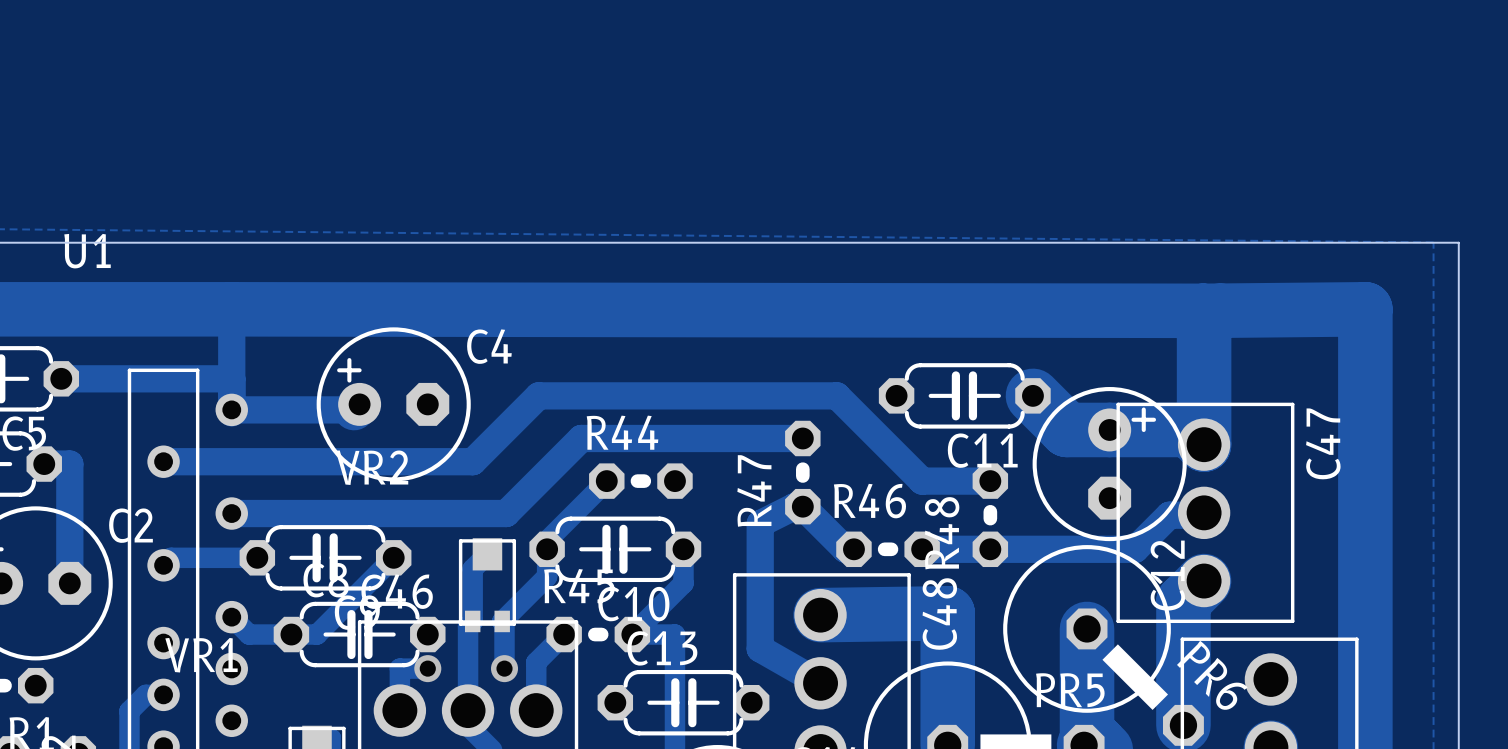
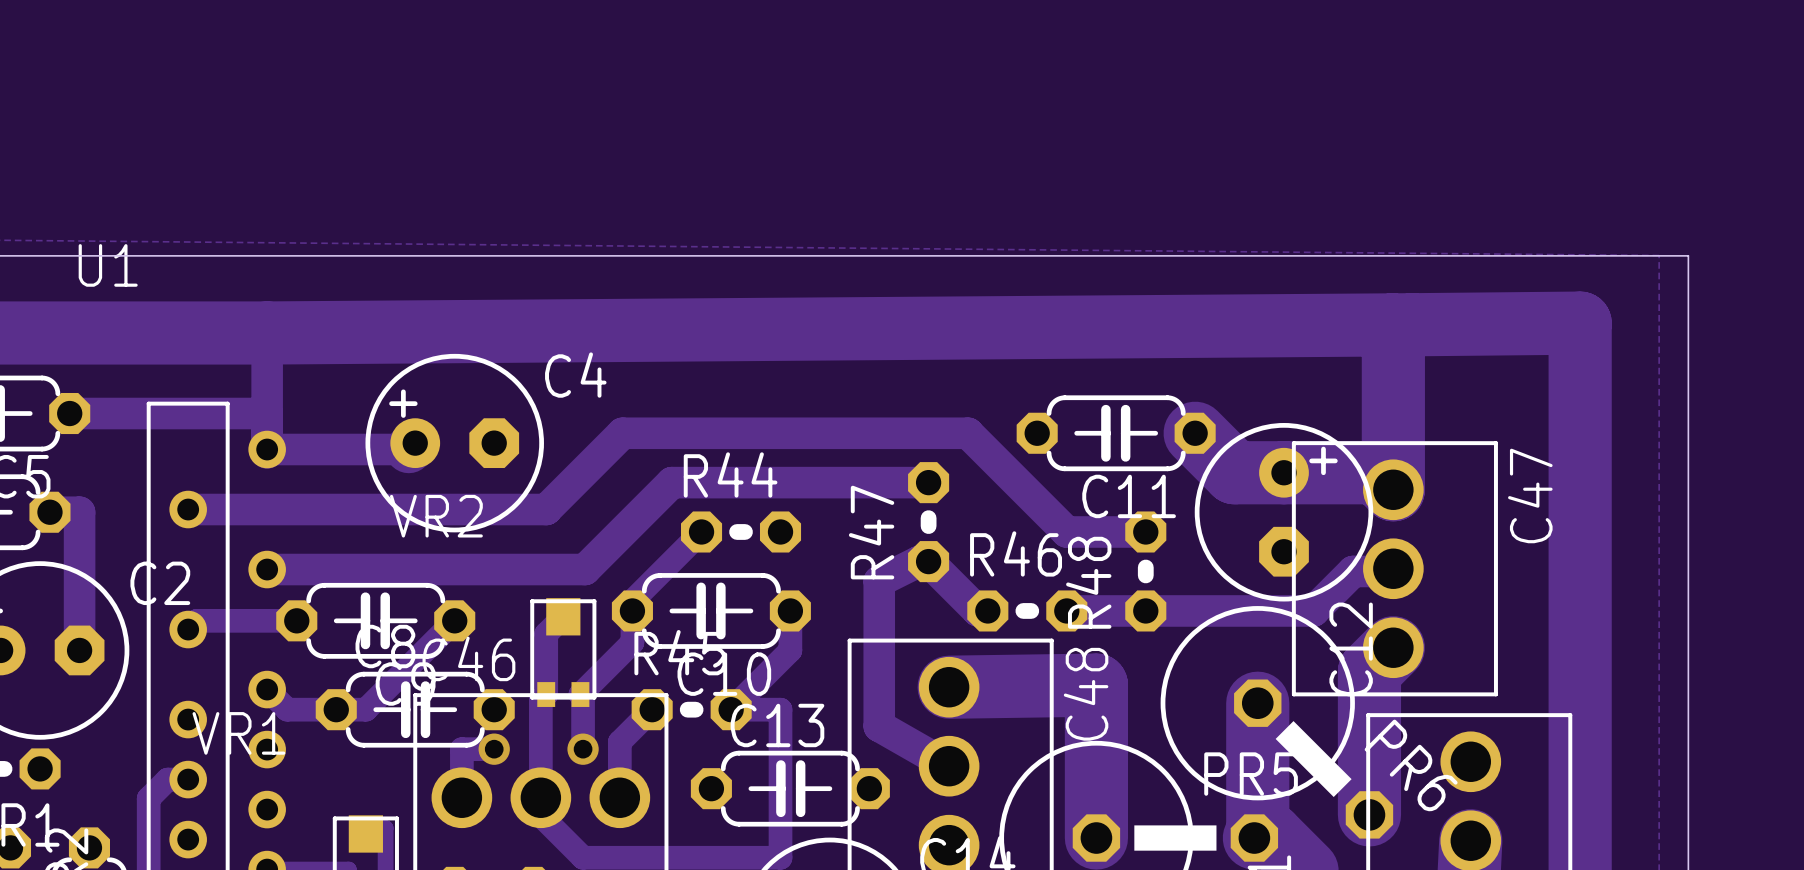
track: (231, 309) (1203, 310) -> (267, 332) (1580, 323) (1580, 332)
track: (1365, 309) (1203, 310) -> none

